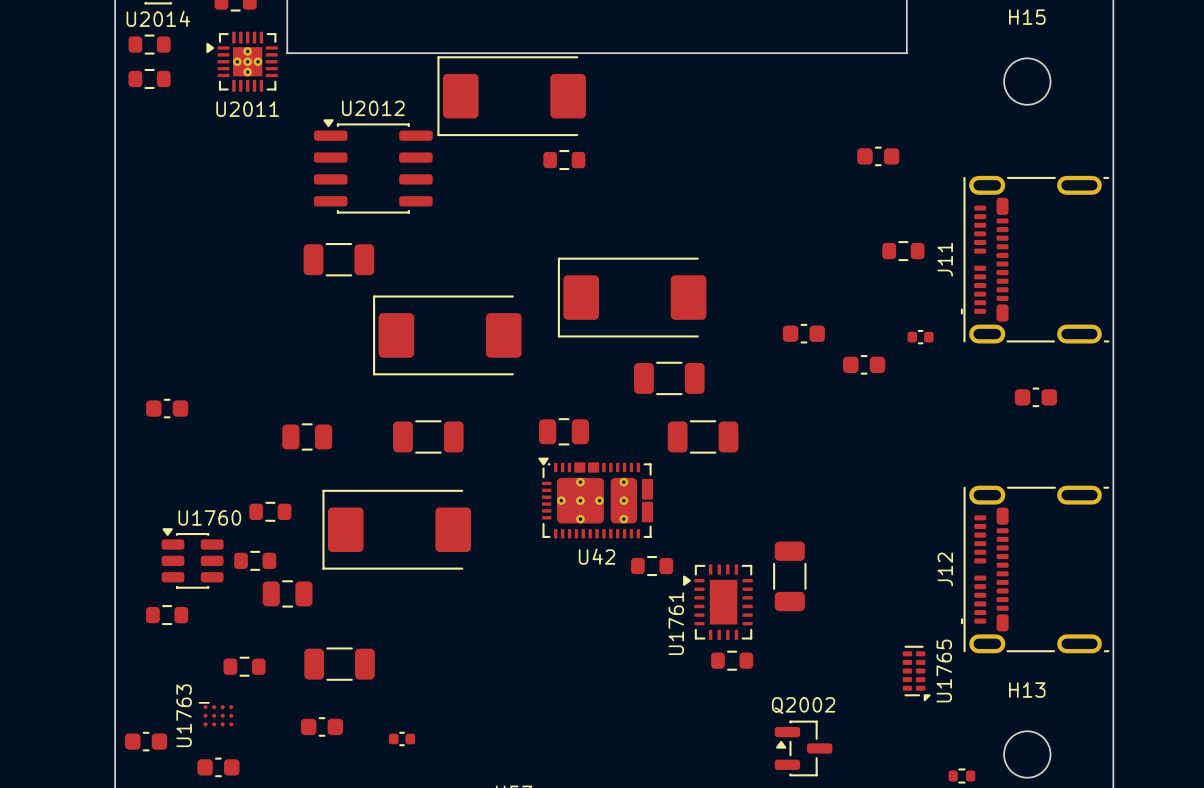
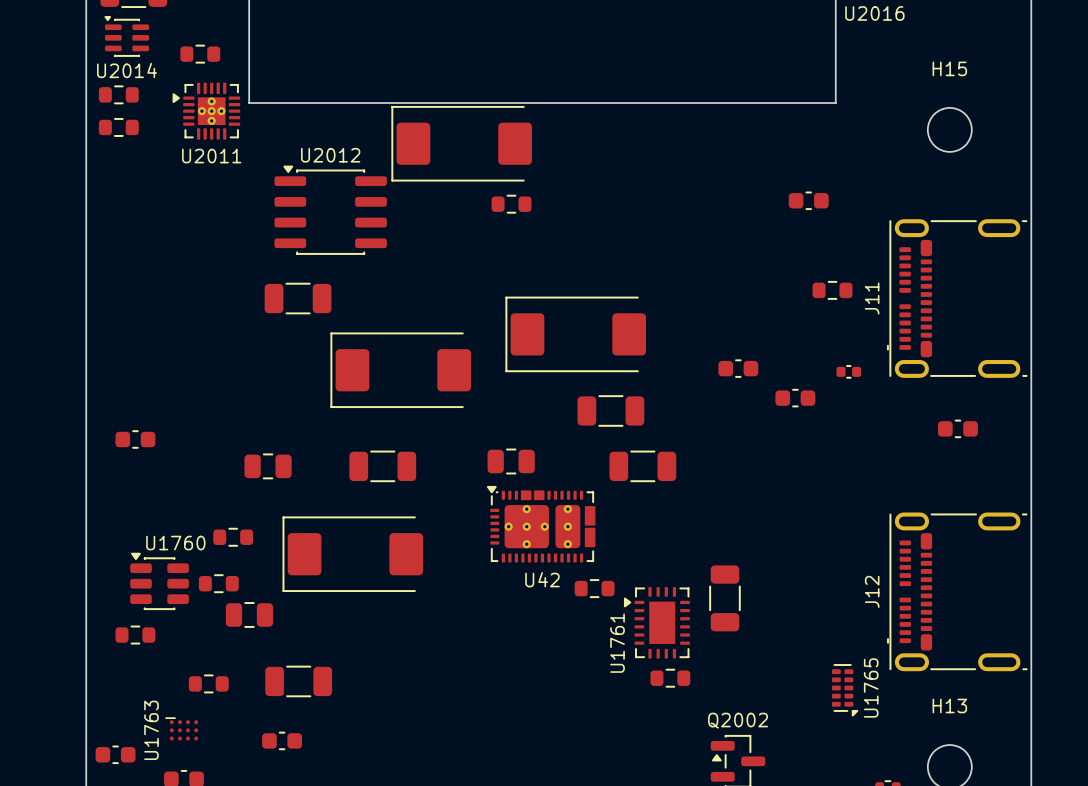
part: (402, 739) -> none

